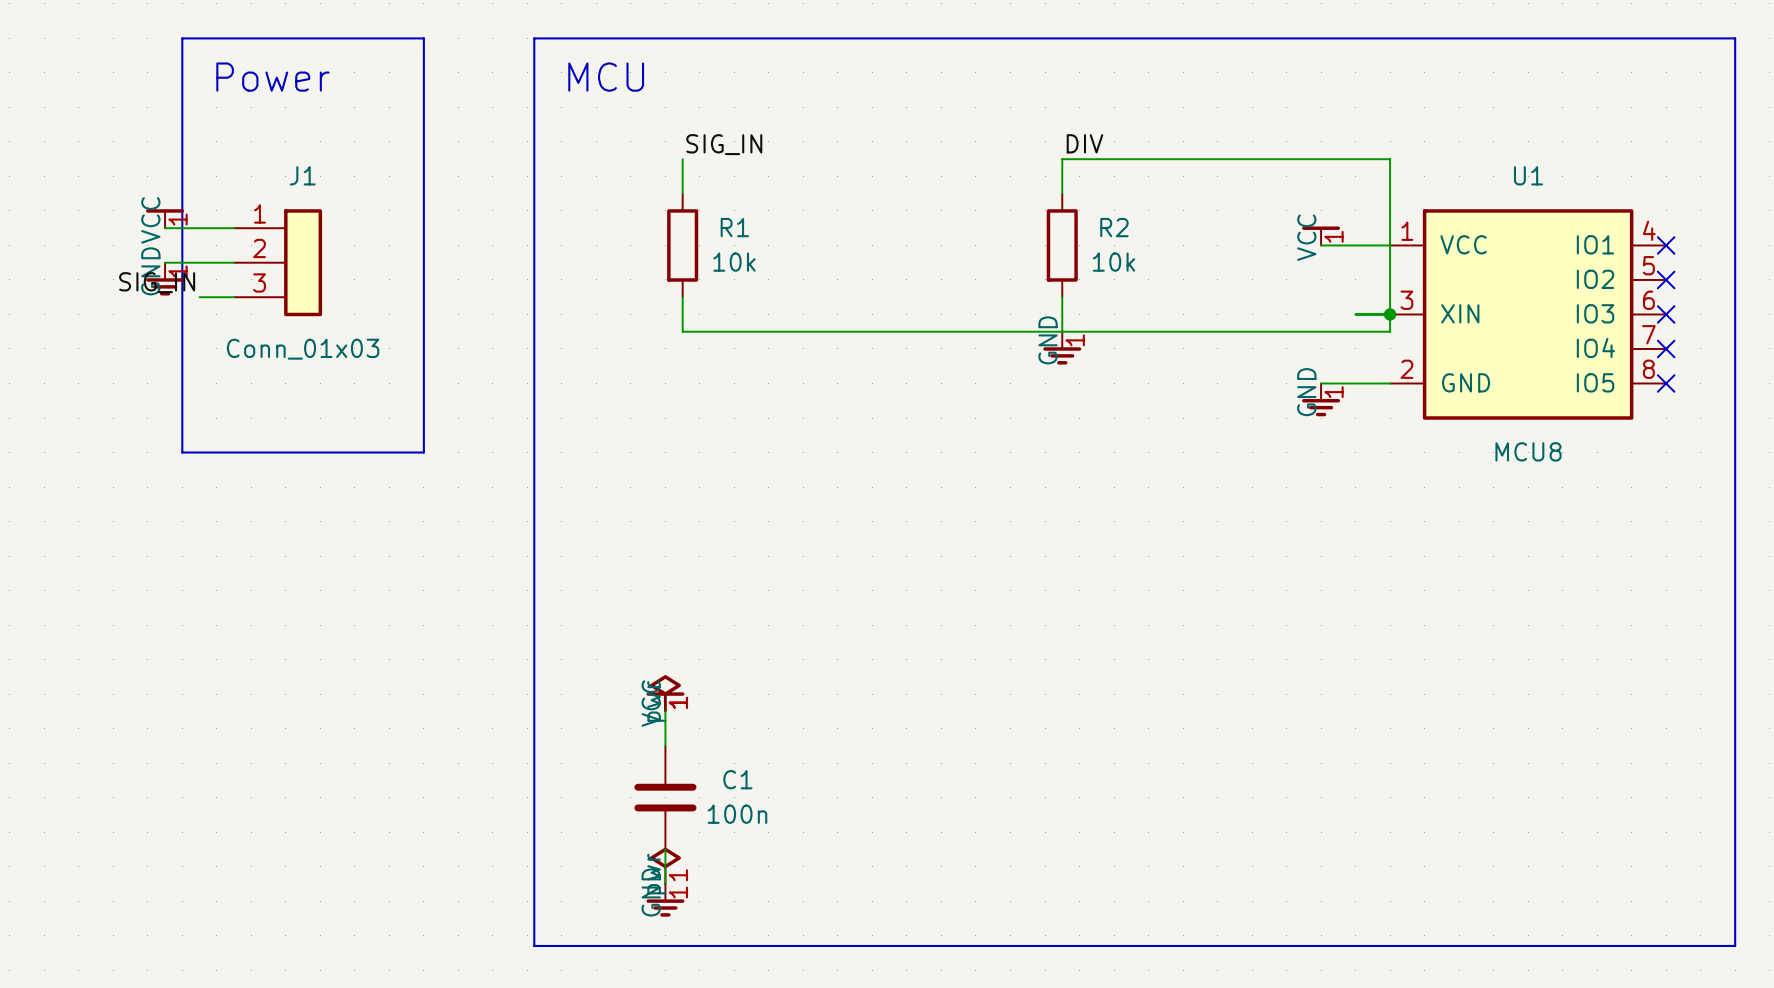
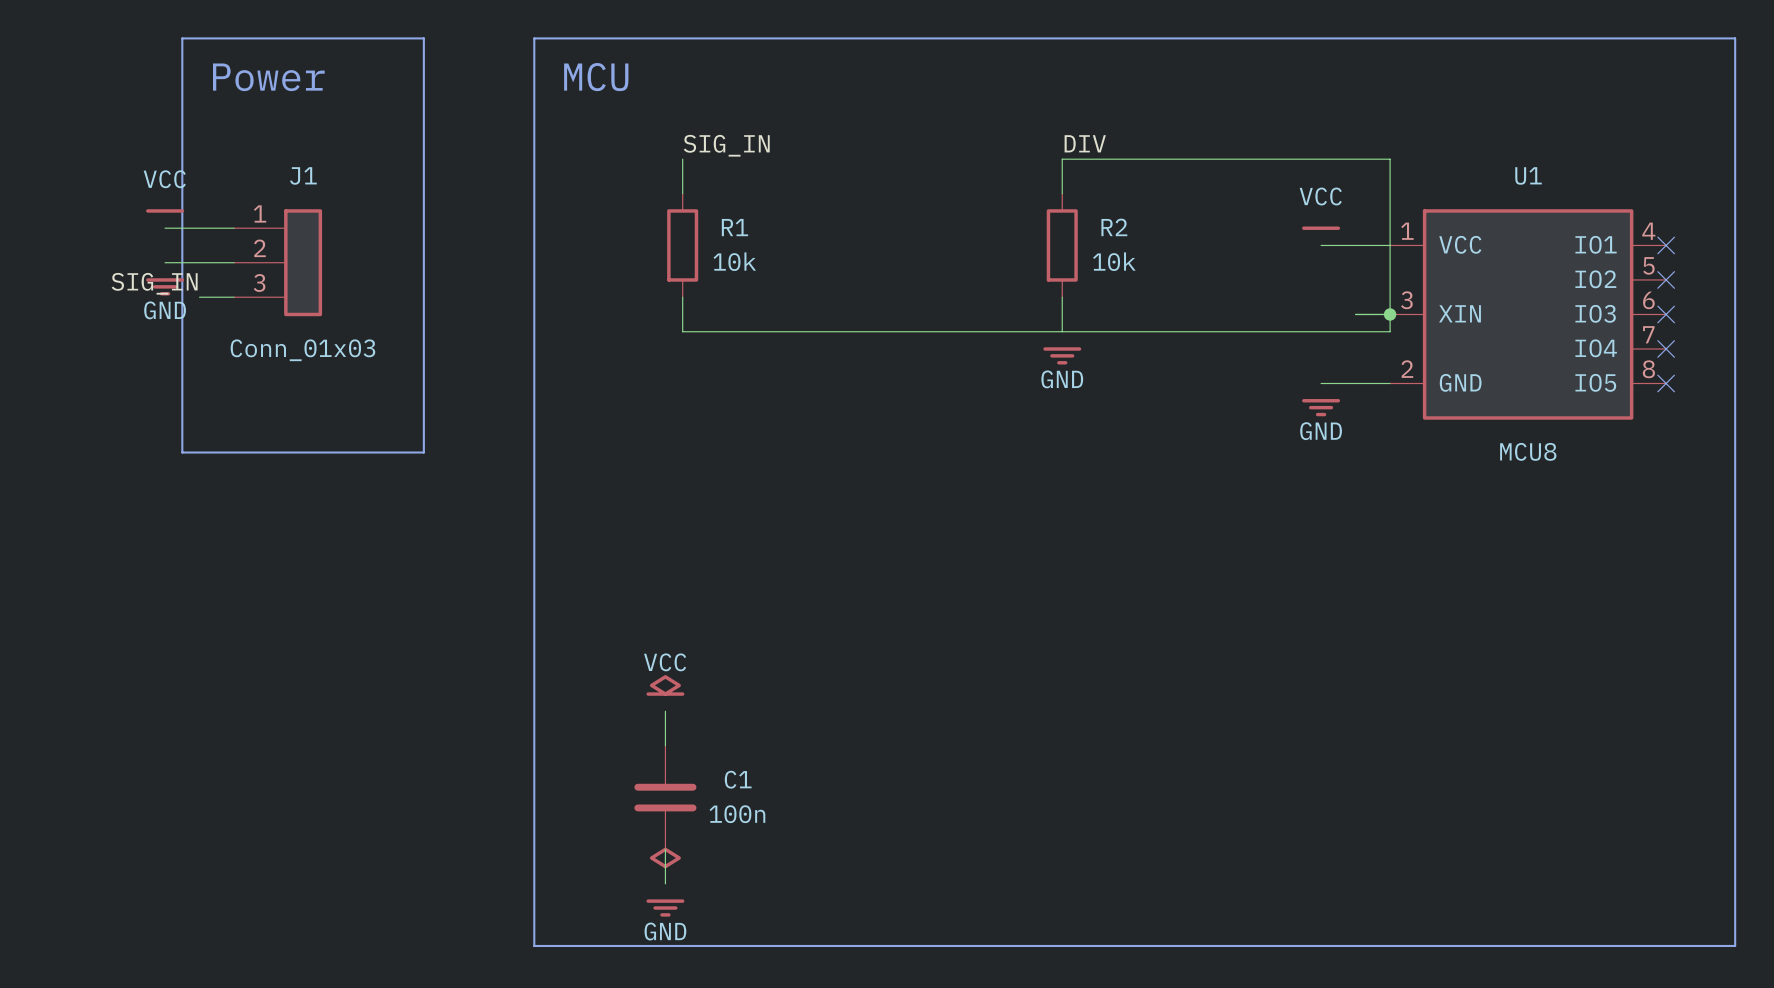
power symbol text: none -> VCC (164, 179)
power symbol text: none -> VCC (1320, 196)
power symbol shape: [146, 209, 185, 229] -> [146, 209, 185, 213]
power symbol shape: [1302, 226, 1341, 246] -> [1302, 226, 1341, 230]
power symbol shape: [146, 262, 185, 296] -> [146, 278, 185, 296]
power symbol text: none -> GND (165, 310)
power symbol shape: [1043, 331, 1082, 365] -> [1043, 347, 1082, 365]
power symbol text: none -> GND (1062, 379)
power symbol shape: [1302, 383, 1341, 417] -> [1302, 399, 1341, 417]
power symbol text: none -> GND (1321, 431)
power symbol text: none -> VCC (665, 662)
power symbol shape: [649, 675, 681, 712] -> [646, 692, 685, 696]
power symbol: none -> (665, 685)
power symbol: (665, 701) -> none
power symbol shape: [649, 847, 681, 884] -> [649, 847, 681, 869]
power symbol shape: [646, 883, 685, 917] -> [646, 899, 685, 917]
power symbol text: none -> GND (665, 931)

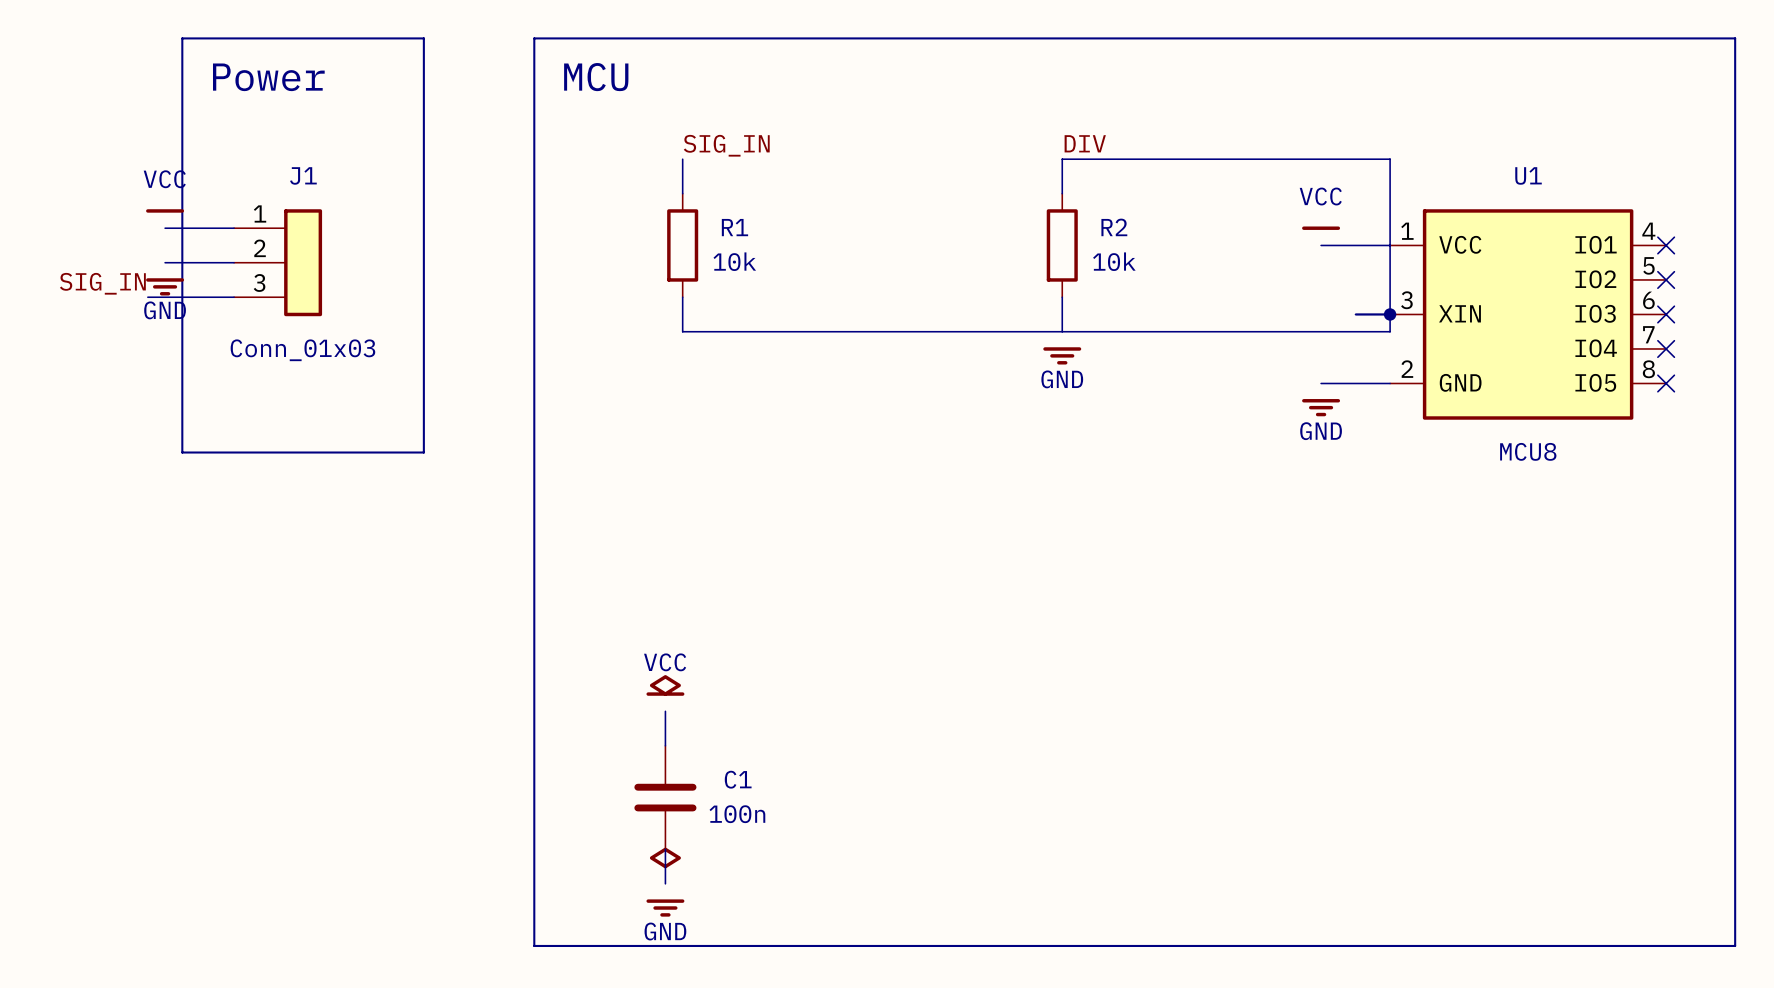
label position: SIG_IN (154, 283) -> SIG_IN (102, 283)
wire: none -> (147, 297) (199, 297)

